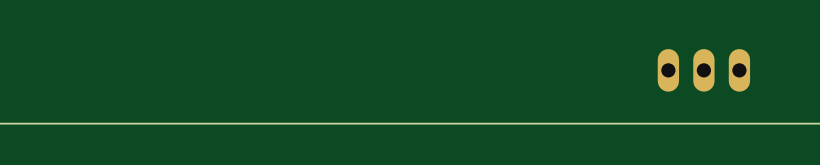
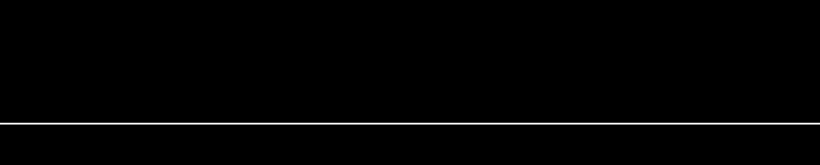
part: (703, 70) -> none

